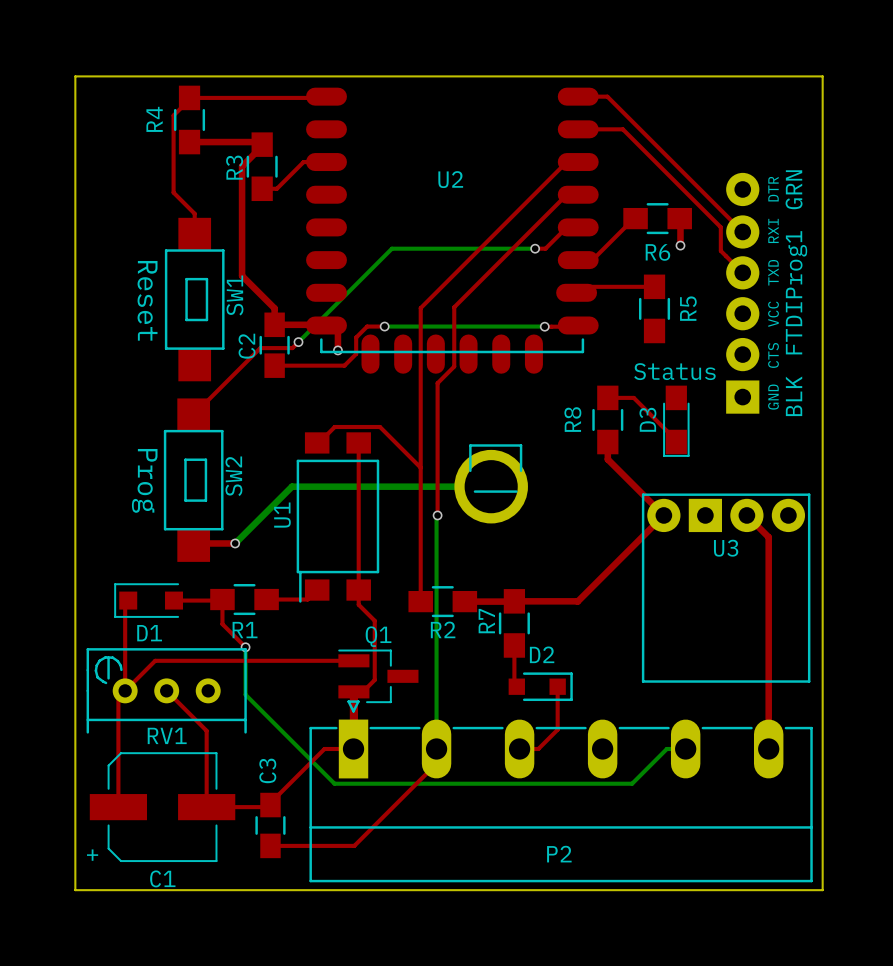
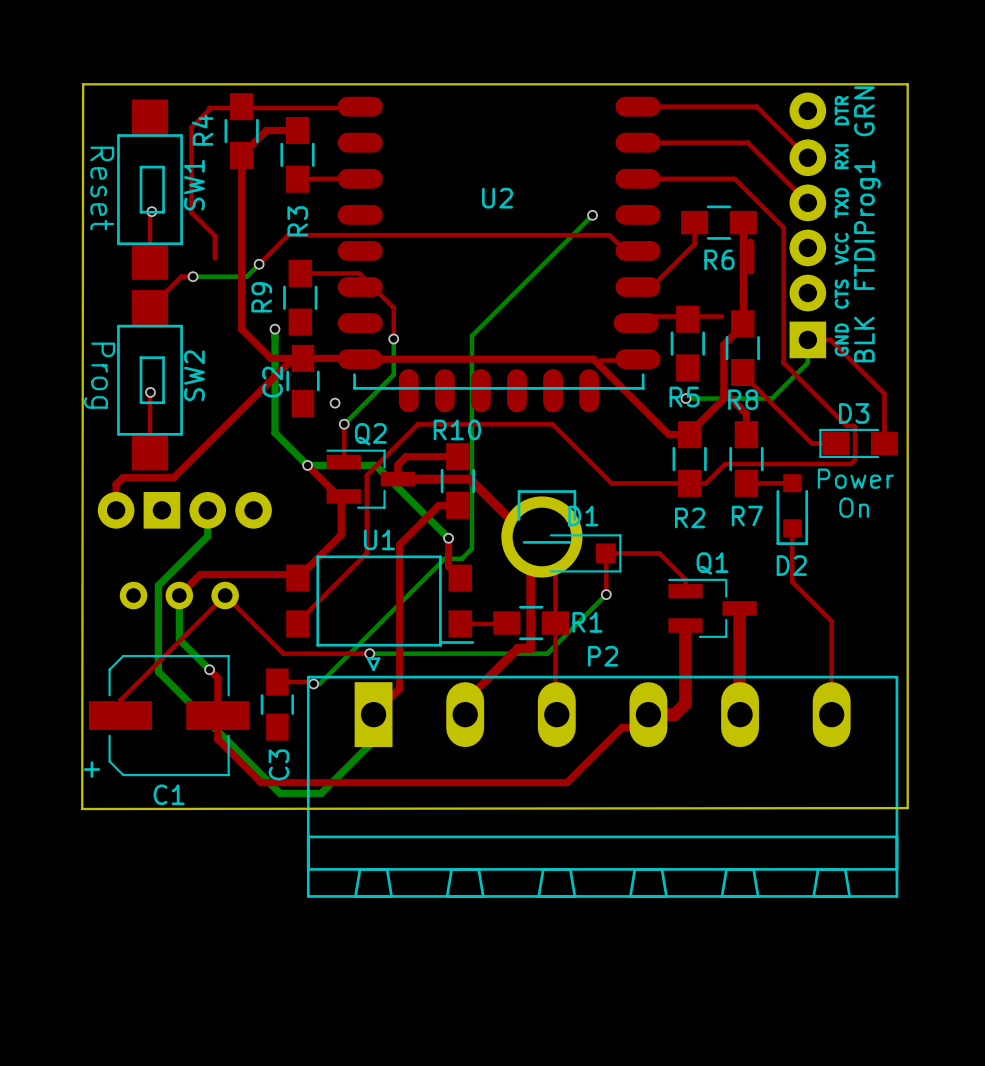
board edge: (75, 76) (75, 890) (822, 890) (822, 732) -> (83, 84) (82, 809) (907, 808)
top track: (607, 96) (742, 231) -> (670, 106) (756, 106) (807, 157)
R4 position: (189, 119) -> (241, 131)
top track: (622, 129) (720, 227) (720, 250) (742, 272) -> (687, 142) (747, 142) (807, 202)
top track: (189, 142) (259, 142) (262, 144) (242, 166) (242, 275) (274, 308) (274, 324) -> (297, 130) (266, 130) (241, 155) (241, 328) (271, 358) (303, 358)
top track: (303, 162) (276, 188) (262, 188) -> (335, 178) (297, 179)
top track: (566, 162) (420, 308) (420, 601) -> (625, 178) (734, 178) (783, 227) (783, 362) (846, 425) (855, 427) (855, 459) (850, 463) (725, 463) (705, 483) (611, 483) (552, 424) (417, 424) (366, 475) (366, 553) (297, 623)
R3 position: (262, 166) -> (297, 154)
R3 name position: R3 (234, 167) -> R3 (297, 221)
top track: none -> (151, 211) (150, 213) (150, 261)
via: none -> (151, 211)
top track: (565, 193) (454, 307) (454, 366) (437, 383) (437, 515) -> none
bottom track: none -> (592, 215) (471, 335) (471, 548) (461, 558) (444, 558) (319, 683) (313, 683)
top track: (635, 218) (590, 260) -> (694, 222) (694, 244) (651, 286)
R6 position: (657, 218) -> (718, 222)
top track: (566, 227) (545, 248) (535, 248) -> (625, 250) (609, 235) (288, 235) (259, 264)
bottom track: none -> (259, 264) (246, 276) (193, 276)
via: none -> (259, 264)
via: (680, 245) -> none
top track: none -> (300, 273) (359, 273) (393, 307) (393, 339)
bottom track: (535, 248) (391, 248) (298, 342) -> none
via position: (535, 248) -> (592, 215)
top track: none -> (193, 276) (181, 276) (150, 308)
via: none -> (193, 276)
R9: none -> (300, 297)
FTDIProg1 position: (742, 293) -> (807, 225)
bottom track: none -> (275, 329) (275, 432) (307, 465) (375, 465) (448, 538)
via: none -> (275, 329)
SW1 position: (194, 299) -> (150, 189)
text position: Reset (147, 300) -> Reset (102, 188)
bottom track: none -> (393, 339) (393, 374) (344, 424)
via: none -> (393, 339)
R5 position: (654, 308) -> (687, 343)
R5 name rotation: 0° (688, 308) -> 90° clockwise (684, 396)
R5 name position: R5 (688, 308) -> R5 (684, 396)
top track: none -> (807, 339) (830, 339) (884, 393) (884, 443)
bottom track: none -> (807, 339) (807, 362) (772, 398) (685, 398)
top track: none -> (292, 358) (173, 477) (122, 477) (116, 484) (116, 510)
top track: (337, 325) (337, 350) -> (372, 359) (593, 359) (669, 434) (689, 434) (723, 398) (723, 344) (742, 325) (743, 222)
top track: (384, 326) (367, 326) (356, 337) (356, 353) (344, 365) (273, 364) -> none
bottom track: (384, 326) (544, 326) -> none
via: (384, 326) -> none
via: (544, 326) -> none
top track: none -> (742, 372) (811, 443) (835, 443)
top track: (298, 342) (292, 348) (260, 348) (193, 414) -> none
via: (298, 342) -> none
via: (337, 350) -> none
top track: none -> (723, 391) (746, 413) (746, 434)
top track: none -> (150, 392) (150, 452)
via: none -> (150, 392)
via: none -> (685, 398)
via: none -> (335, 403)
text: Status (674, 371) -> none
top track: none -> (344, 424) (343, 462)
via: none -> (344, 424)
top track: (607, 397) (633, 397) (676, 442) -> none
top track: none -> (457, 456) (405, 456) (397, 464) (397, 479) (469, 479) (530, 540) (530, 648) (517, 648) (465, 701) (465, 714)
R8 name rotation: 0° (572, 419) -> 90° clockwise (743, 399)
R8 name position: R8 (572, 419) -> R8 (743, 399)
R8 position: (607, 419) -> (742, 348)
top track: none -> (307, 465) (338, 496) (343, 496)
via: none -> (307, 465)
D3 rotation: 0° (676, 421) -> 90° clockwise (858, 443)
D3 position: (676, 421) -> (858, 443)
text: none -> Power (855, 478)
Q2: none -> (370, 479)
R10: none -> (457, 481)
top track: none -> (746, 483) (792, 483)
top track: (317, 442) (334, 427) (380, 427) (420, 467) -> none
top track: (358, 442) (358, 604) (374, 620) (374, 680) (362, 691) (353, 691) (353, 748) (324, 748) (268, 807) (206, 807) (206, 730) (166, 690) -> none
top track: (607, 442) (607, 459) (663, 515) (577, 601) (464, 601) -> none
top track: none -> (341, 496) (341, 534) (297, 578) (294, 574) (200, 574) (179, 595)
top track: none -> (457, 505) (438, 505) (399, 544) (399, 688) (373, 714)
text: none -> On (854, 507)
part: none -> (184, 510)
bottom track: none -> (207, 510) (207, 536) (158, 585) (158, 671) (280, 793) (321, 793) (373, 740) (373, 714)
top track: none -> (792, 528) (792, 581) (831, 621) (831, 727)
text position: Prog (144, 480) -> Prog (99, 375)
SW2 position: (193, 480) -> (150, 380)
bottom track: (491, 486) (291, 486) (235, 543) -> none
top track: none -> (448, 538) (448, 566) (460, 578)
top track: none -> (555, 553) (556, 714)
U1 name position: U1 (282, 515) -> U1 (379, 539)
bottom track: (437, 515) (436, 748) -> none
via position: (437, 515) -> (448, 538)
top track: (746, 515) (768, 537) (768, 748) -> none
U1 rotation: 0° (337, 517) -> 90° counterclockwise (380, 601)
top track: none -> (685, 591) (685, 579) (659, 553) (605, 553) (606, 594)
bottom track: none -> (606, 594) (547, 653) (369, 653)
via: none -> (606, 594)
bottom track: none -> (179, 595) (179, 639) (209, 669)
top track: (235, 543) (195, 543) (193, 545) -> none
via: (235, 543) -> none
top track: none -> (739, 608) (740, 714)
top track: none -> (506, 623) (460, 623)
top track: none -> (685, 625) (685, 703) (674, 714) (648, 714) (635, 727) (622, 727) (567, 782) (261, 782) (217, 739) (217, 677) (209, 669)
U3: (726, 588) -> none
top track: (317, 590) (307, 599) (266, 599) -> none
top track: none -> (369, 653) (283, 653) (225, 595) (120, 700) (120, 715)
via: none -> (369, 653)
R1 position: (244, 599) -> (531, 623)
top track: (128, 600) (125, 603) (125, 690) -> none
D1 rotation: 0° (148, 600) -> 180° (583, 553)
D1 position: (148, 600) -> (583, 553)
top track: (174, 600) (222, 599) (222, 624) (245, 647) -> none
R2 rotation: 0° (442, 601) -> 90° clockwise (689, 459)
R2 position: (442, 601) -> (689, 459)
via: none -> (209, 669)
top track: none -> (277, 682) (311, 682) (313, 683)
via: none -> (313, 683)
R7 name rotation: 0° (486, 621) -> 90° clockwise (747, 516)
R7 name position: R7 (486, 621) -> R7 (747, 516)
R7 position: (514, 623) -> (746, 459)
R1 name position: R1 (245, 630) -> R1 (587, 622)
top track: (514, 645) (514, 684) (516, 686) -> none
bottom track: (245, 647) (245, 694) (334, 783) (632, 783) (666, 748) (685, 748) -> none
via: (245, 647) -> none
D2 name position: D2 (542, 654) -> D2 (791, 565)
top track: (353, 660) (155, 660) (118, 697) (118, 807) -> none
Q1 position: (378, 676) -> (712, 608)
D2 rotation: 0° (540, 686) -> 90° clockwise (792, 509)
D2 position: (540, 686) -> (792, 509)
top track: (557, 686) (557, 729) (538, 748) (519, 748) (517, 746) -> none
RV1 side: top (166, 690) -> bottom (179, 595)
P2 footprint: [309, 700, 813, 883] -> [306, 657, 899, 898]
top track: (436, 748) (436, 763) (354, 845) (270, 845) -> none
C3 name position: C3 (267, 770) -> C3 (278, 764)
C1 position: (162, 807) -> (169, 715)
C3 position: (270, 825) -> (277, 704)
P2 name position: P2 (559, 854) -> P2 (603, 656)

